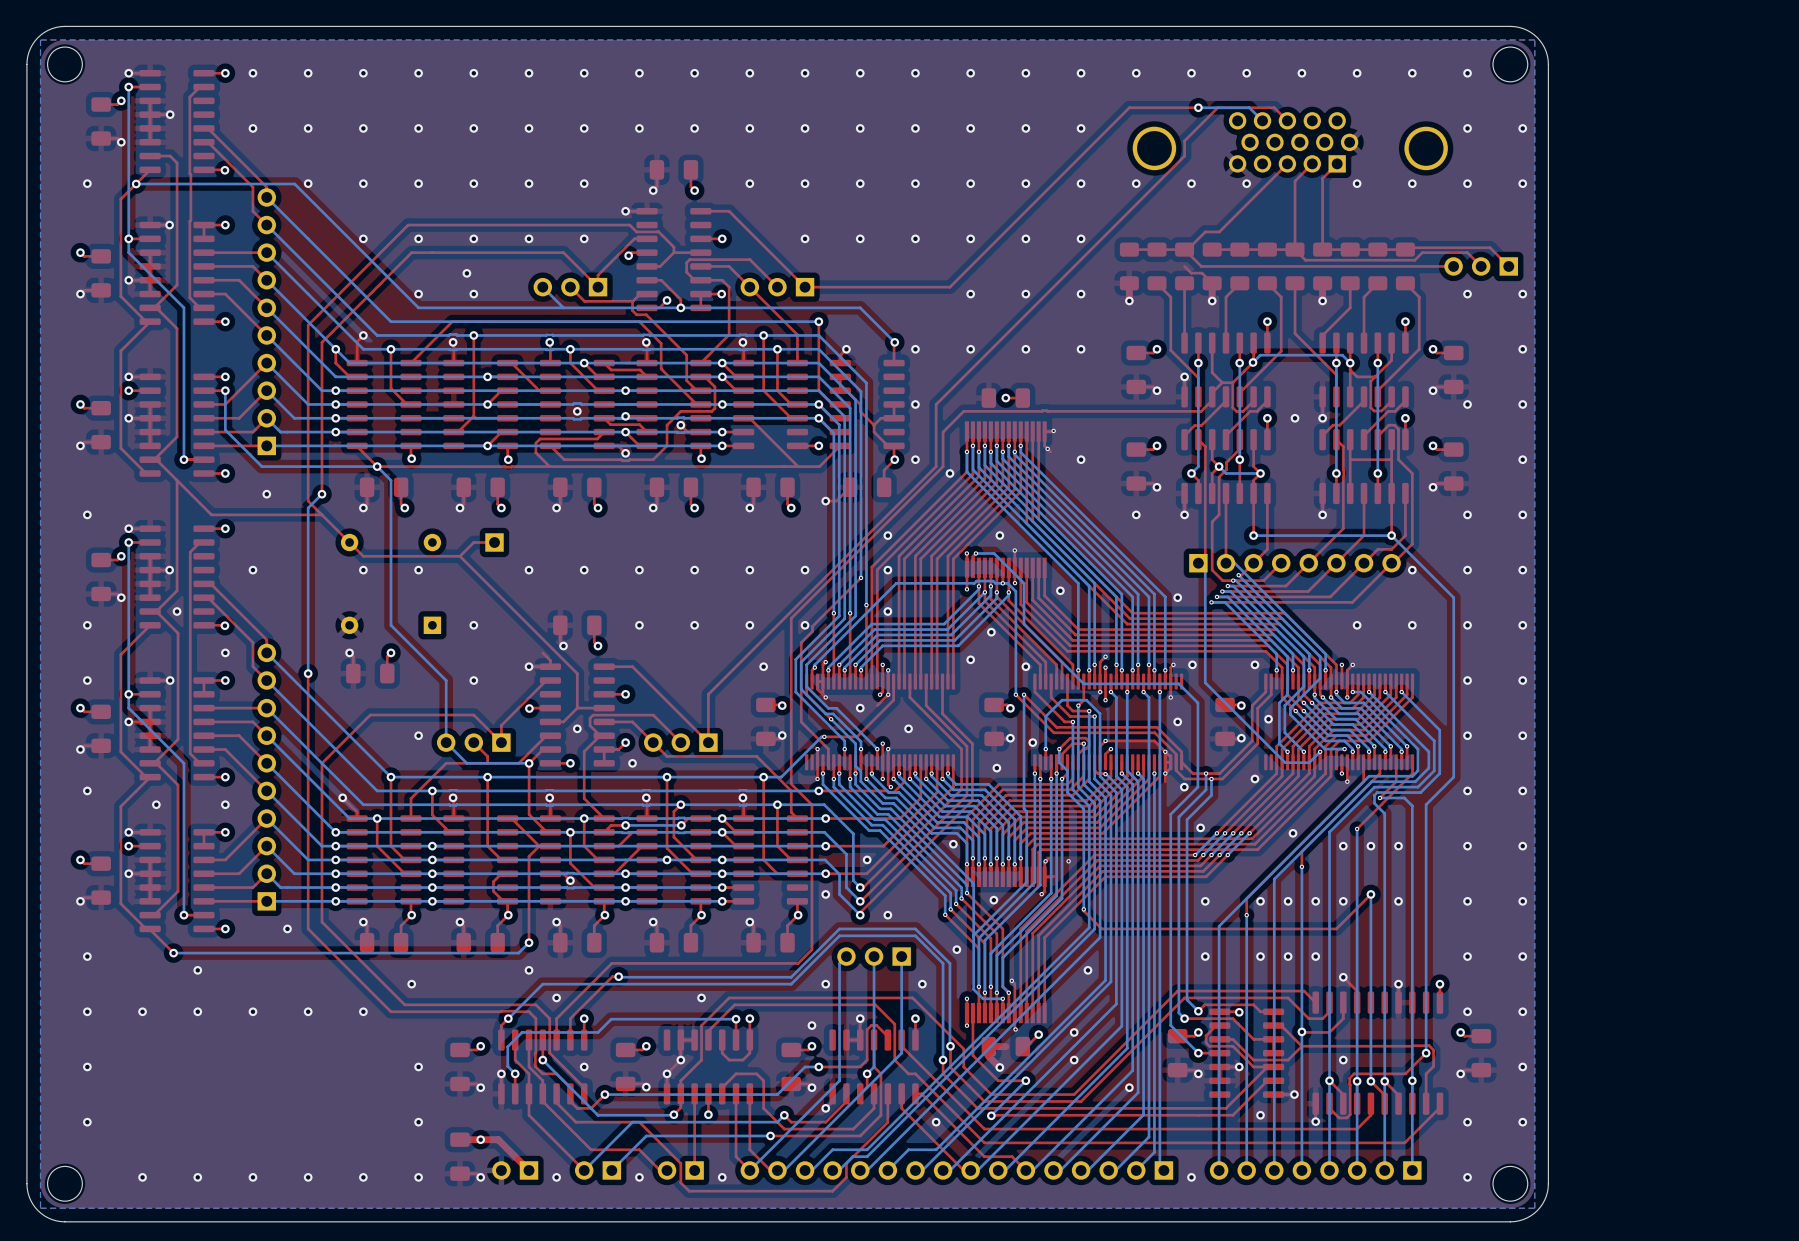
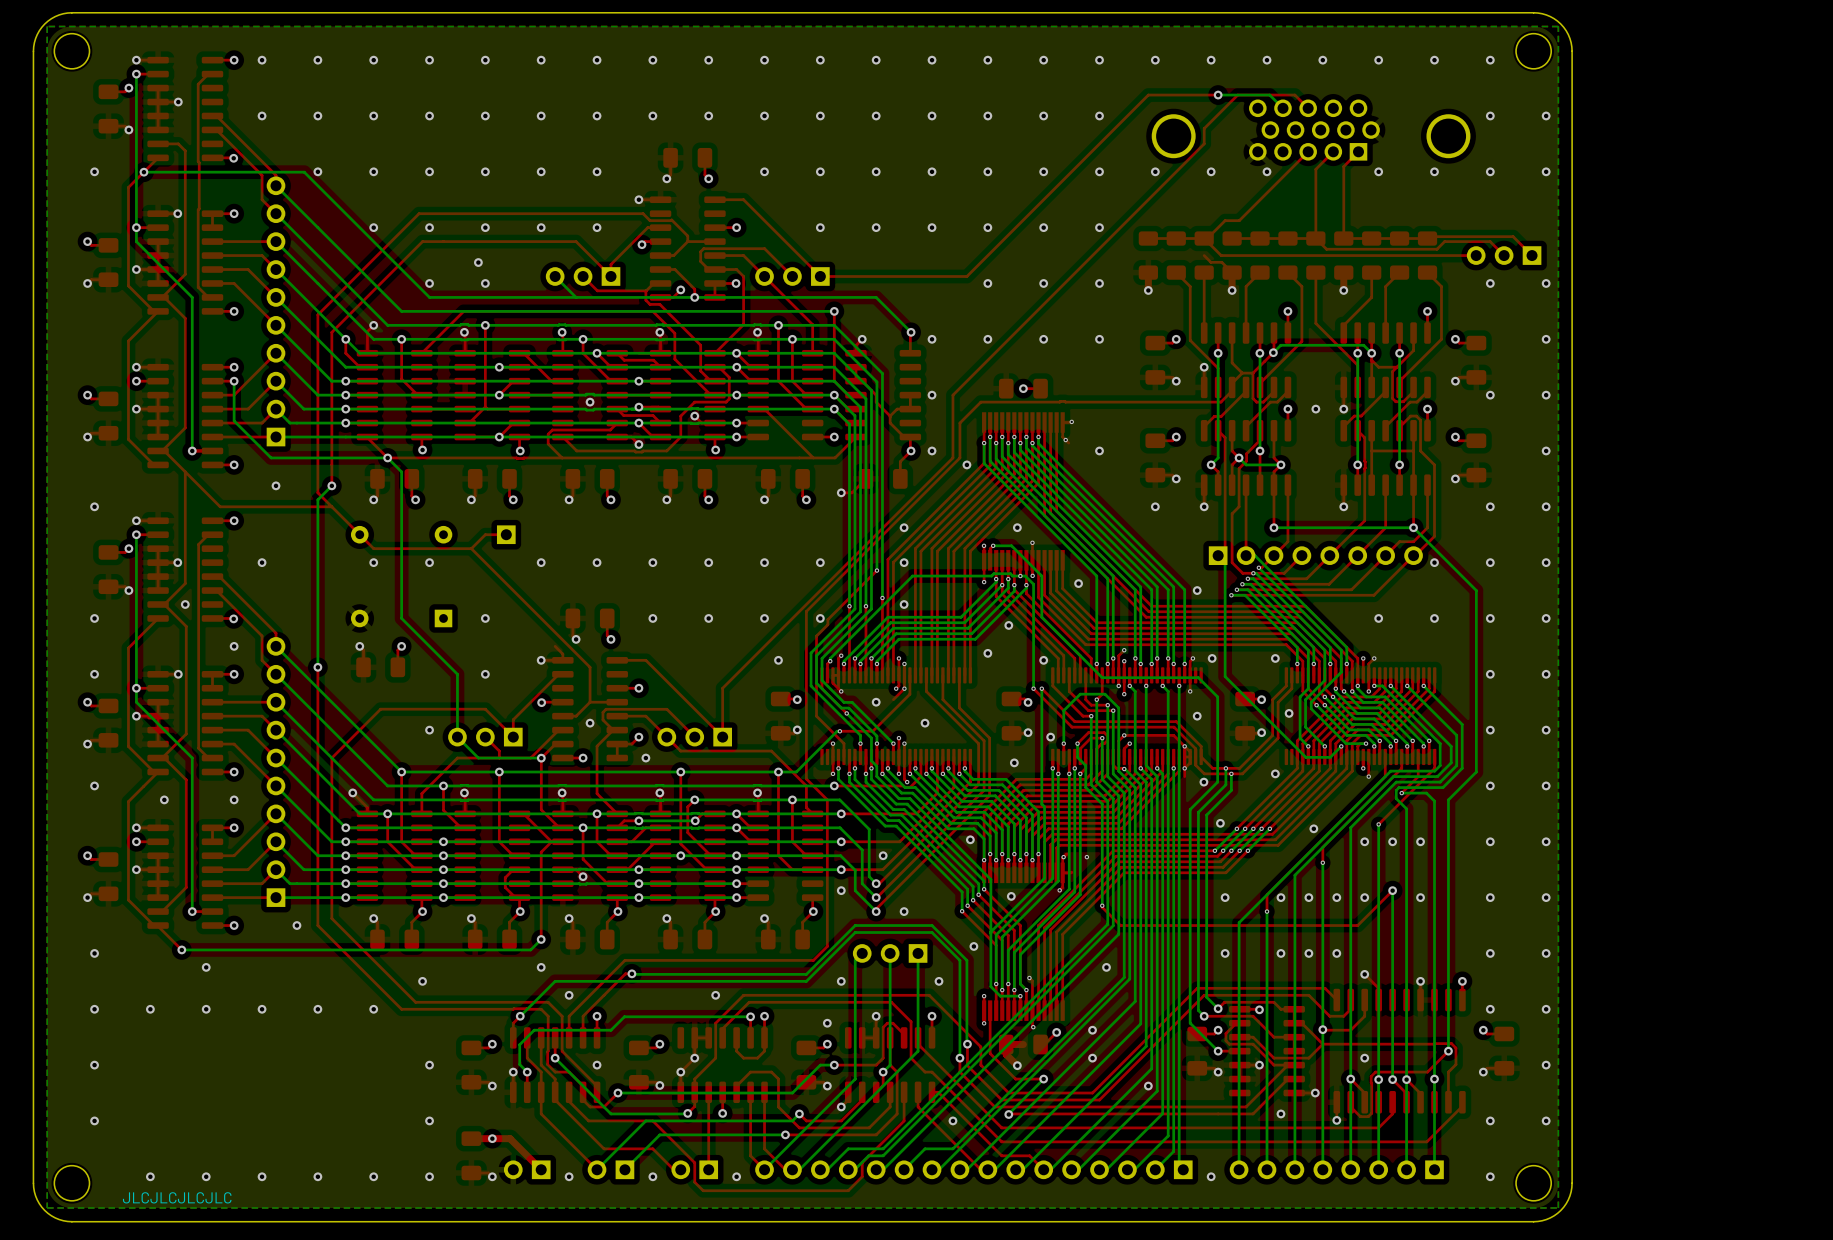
text: none -> JLCJLCJLCJLC (177, 1197)

